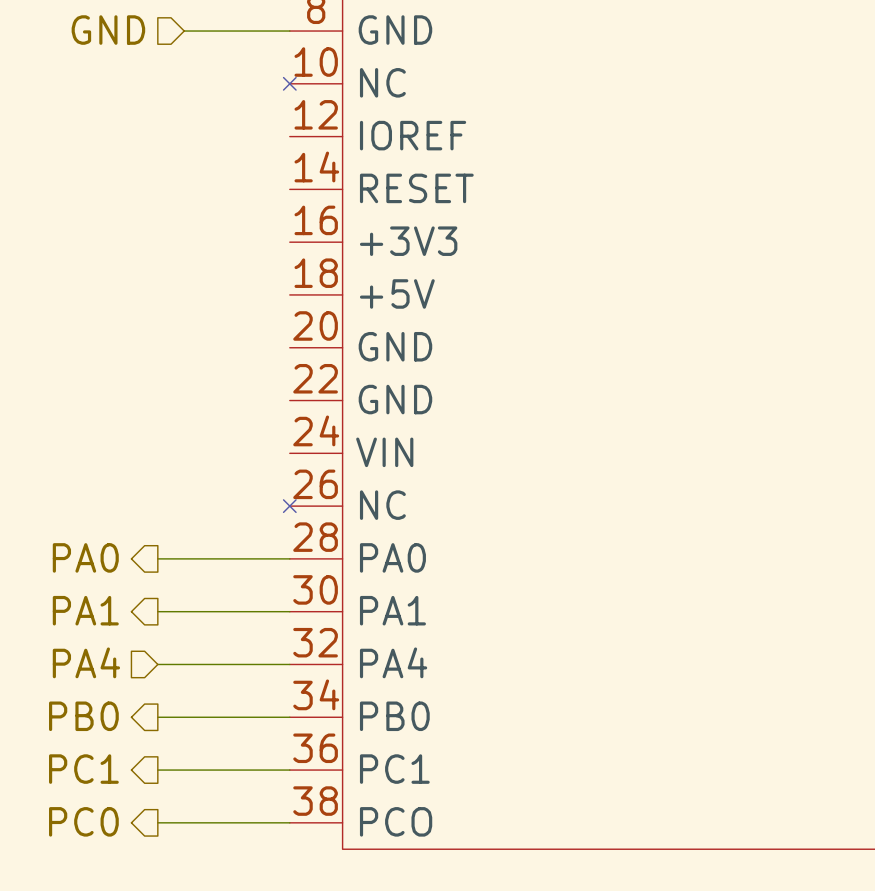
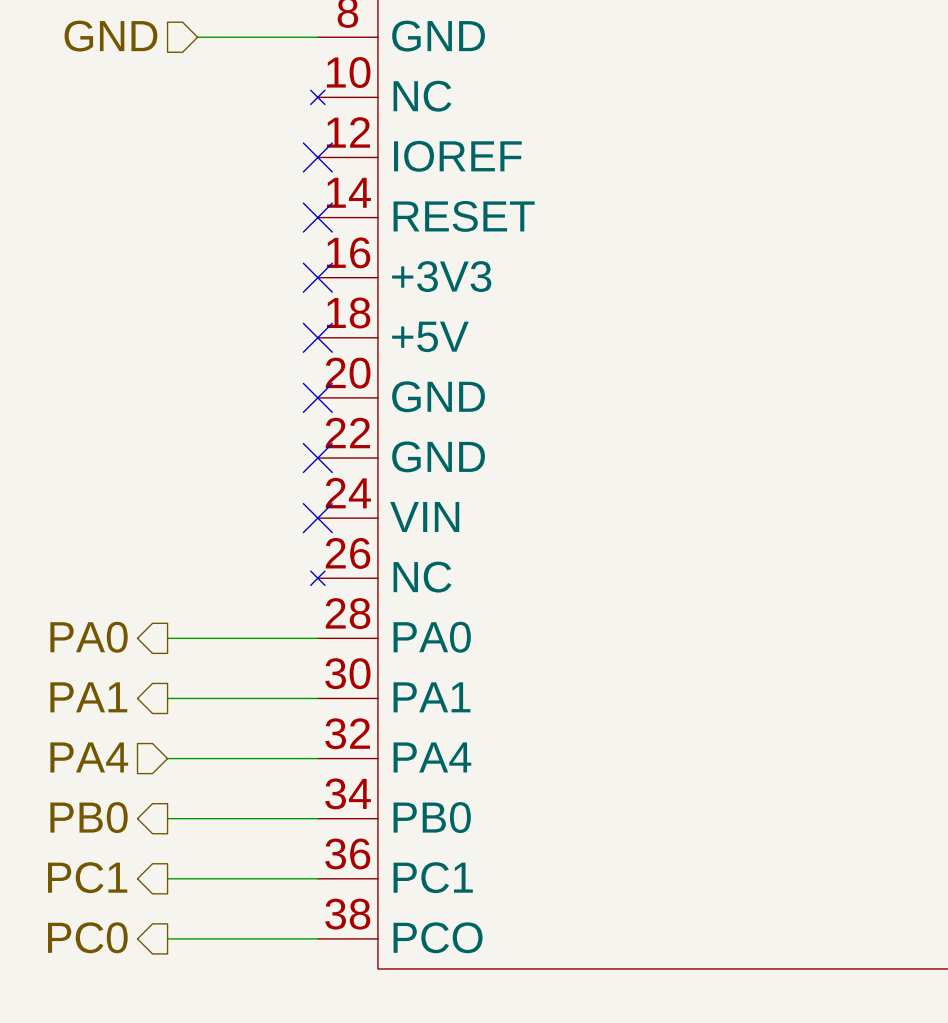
no-connect mark: none -> (317, 157)
no-connect mark: none -> (317, 217)
no-connect mark: none -> (317, 277)
no-connect mark: none -> (317, 337)
no-connect mark: none -> (317, 397)
no-connect mark: none -> (317, 458)
no-connect mark: none -> (317, 518)

